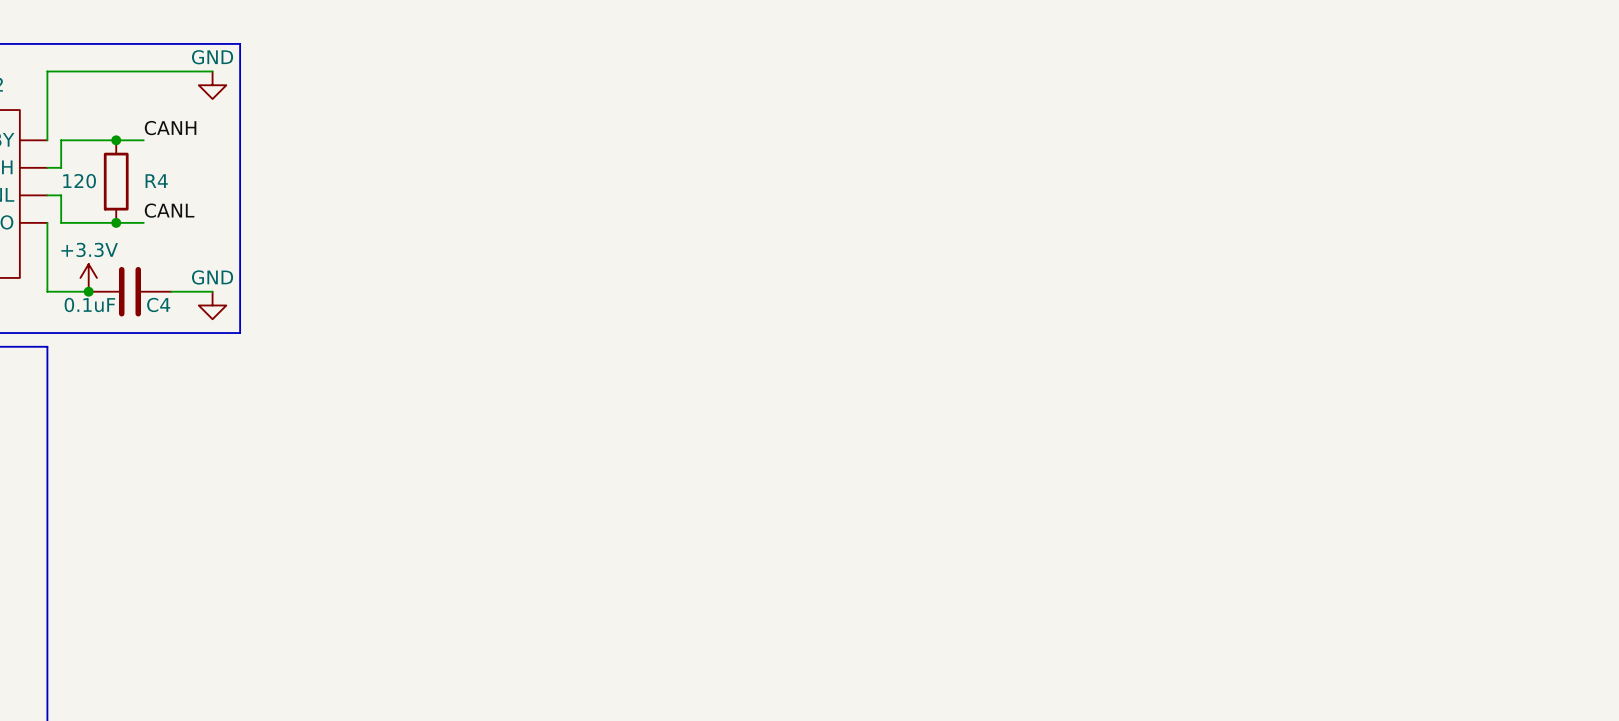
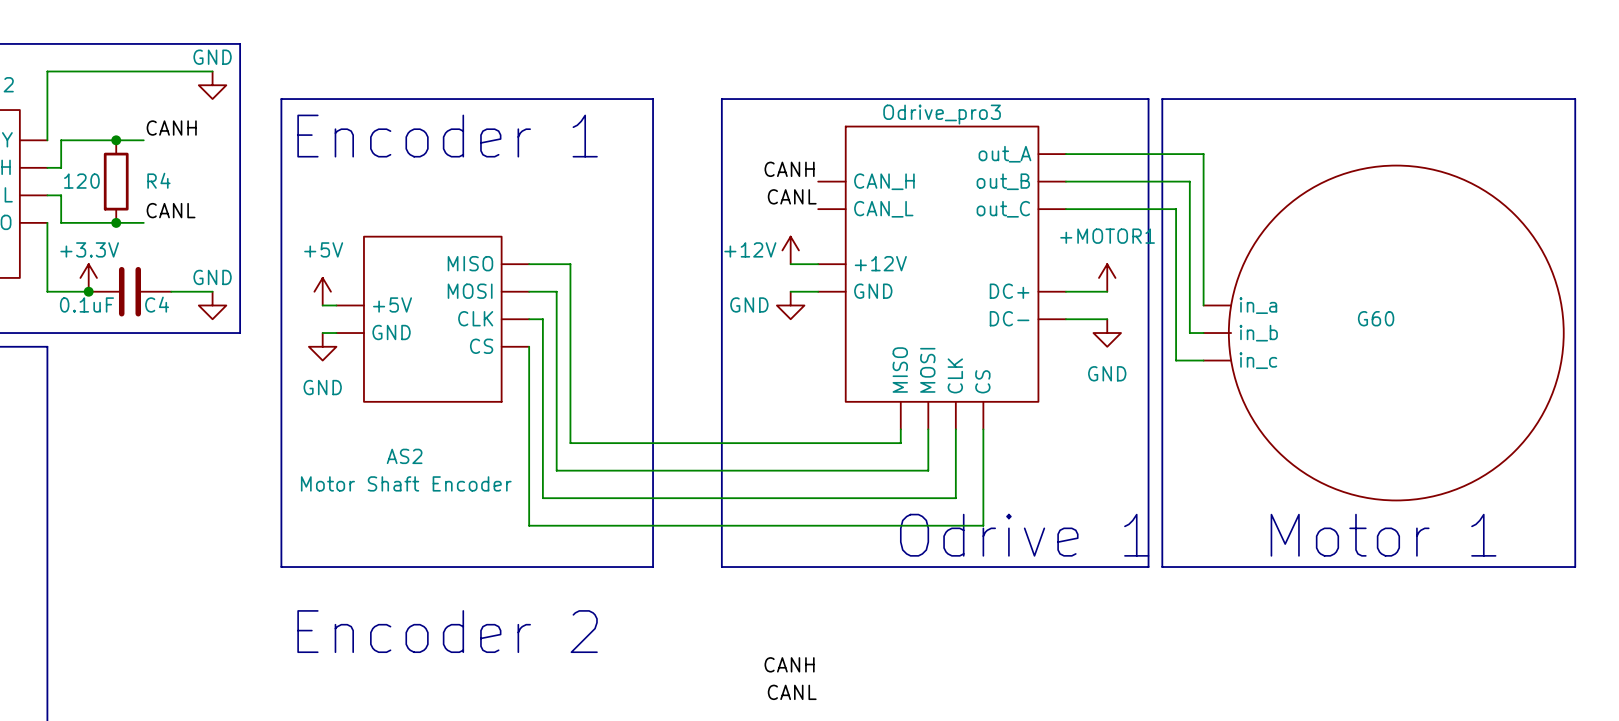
line: none -> (281, 99) (653, 99) (653, 567) (281, 567) (281, 99)
line: none -> (721, 99) (1148, 99) (1148, 567) (721, 567) (721, 99)
line: none -> (1162, 99) (1575, 99) (1575, 567) (1162, 567) (1162, 99)
text: none -> Encoder 1 (447, 136)
wire: none -> (1065, 154) (1203, 154) (1203, 305)
label: none -> CANH (789, 169)
wire: none -> (1065, 181) (1189, 181) (1189, 333) (1203, 333)
label: none -> CANL (792, 196)
wire: none -> (1065, 209) (1176, 209) (1176, 360) (1203, 360)
power symbol: none -> +12V (790, 250)
wire: none -> (529, 264) (570, 264) (570, 443) (900, 443) (900, 429)
wire: none -> (790, 264) (818, 264)
Odrive_pro3: none -> (942, 277)
power symbol: none -> +MOTOR1 (1107, 277)
power symbol: none -> +5V (322, 291)
wire: none -> (529, 291) (556, 291) (556, 470) (928, 470) (928, 429)
wire: none -> (790, 291) (818, 291)
wire: none -> (1065, 291) (1107, 291)
wire: none -> (322, 305) (336, 305)
power symbol: none -> GND (790, 305)
AS2: none -> Motor Shaft Encoder (432, 319)
wire: none -> (529, 319) (542, 319) (542, 498) (955, 498) (955, 429)
wire: none -> (1065, 319) (1107, 319)
wire: none -> (322, 333) (336, 333)
power symbol: none -> GND (1107, 333)
G60: none -> (1383, 333)
power symbol: none -> GND (322, 346)
wire: none -> (529, 346) (529, 525) (983, 525) (983, 429)
text: none -> Odrive 1 (1024, 535)
text: none -> Motor 1 (1383, 535)
text: none -> Encoder 2 (447, 631)
label: none -> CANH (789, 664)
label: none -> CANL (792, 692)

